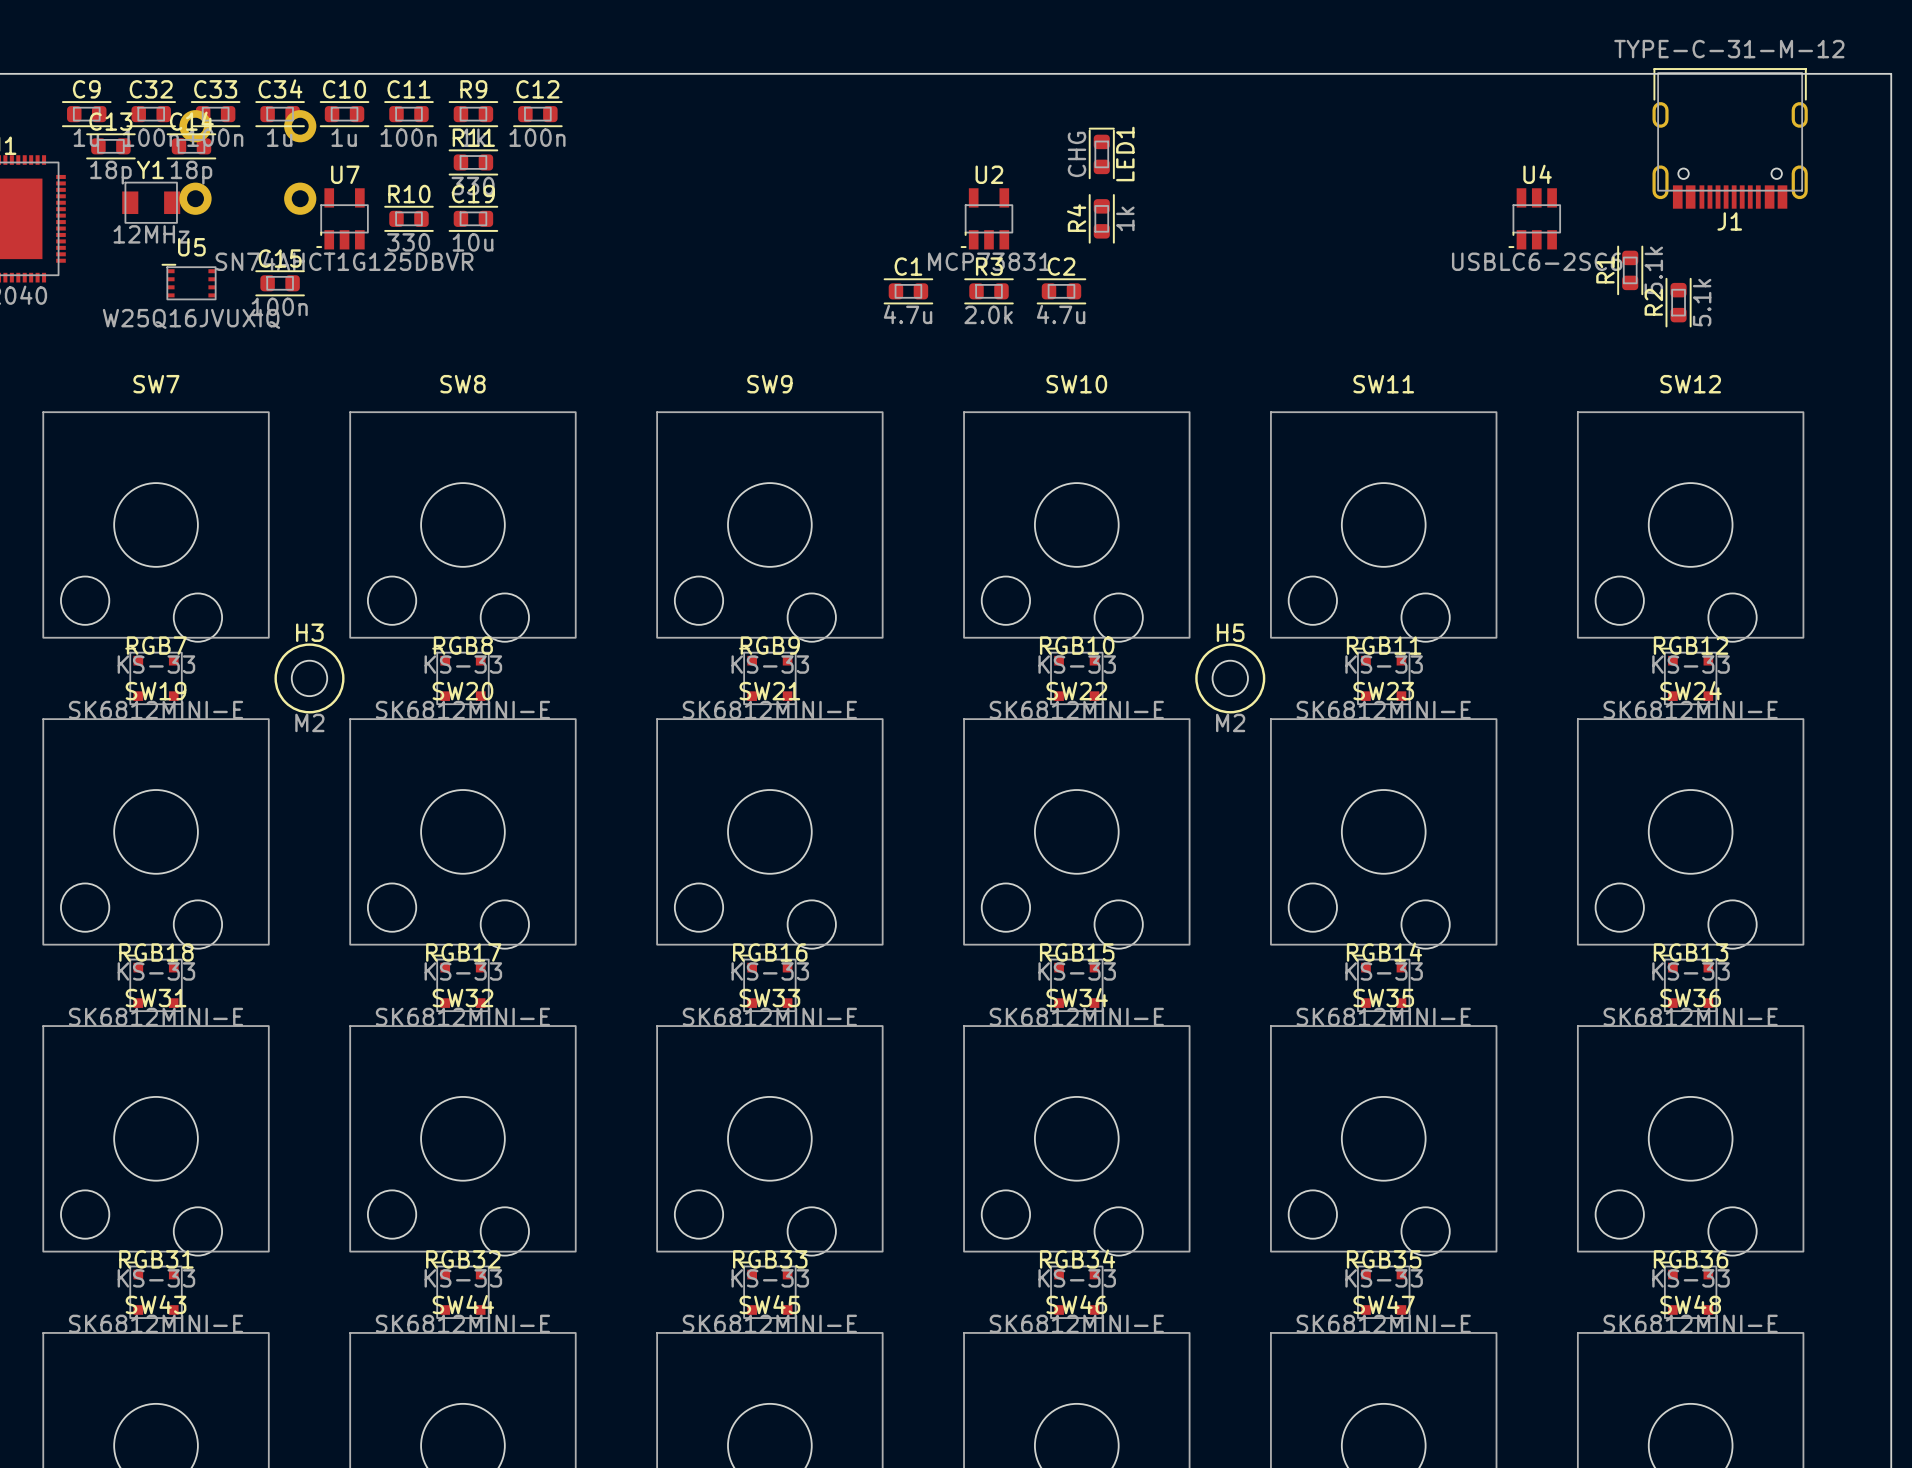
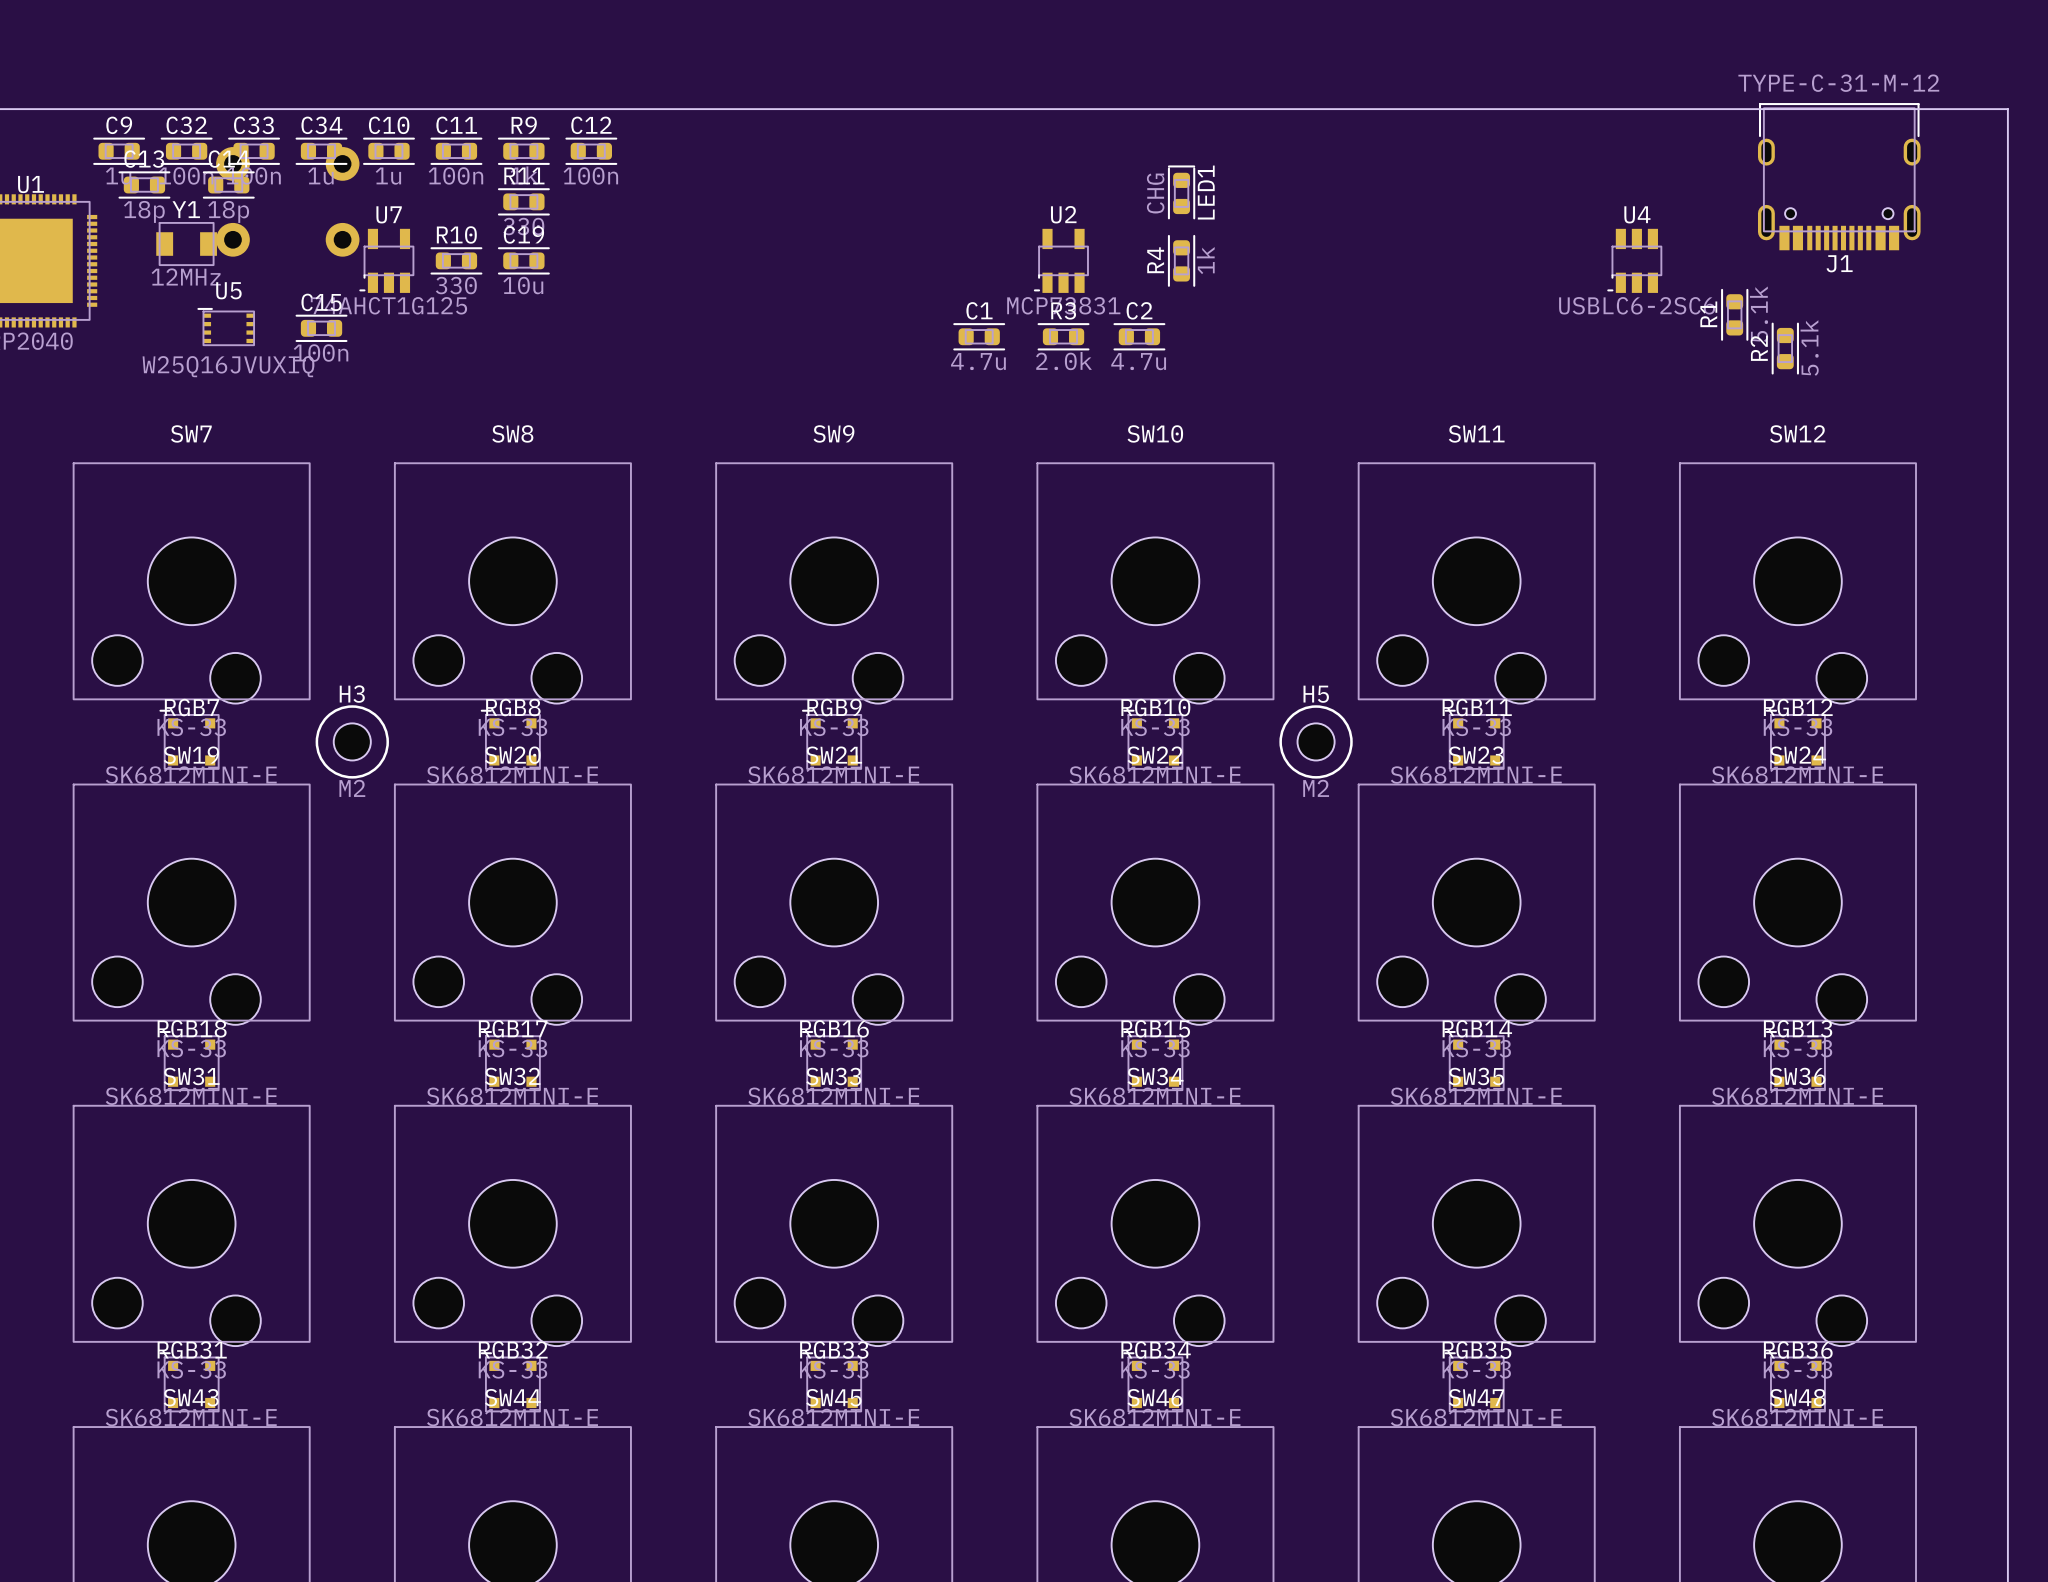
U7 value: SN74AHCT1G125DBVR (344, 261) -> 74AHCT1G125 (388, 305)

